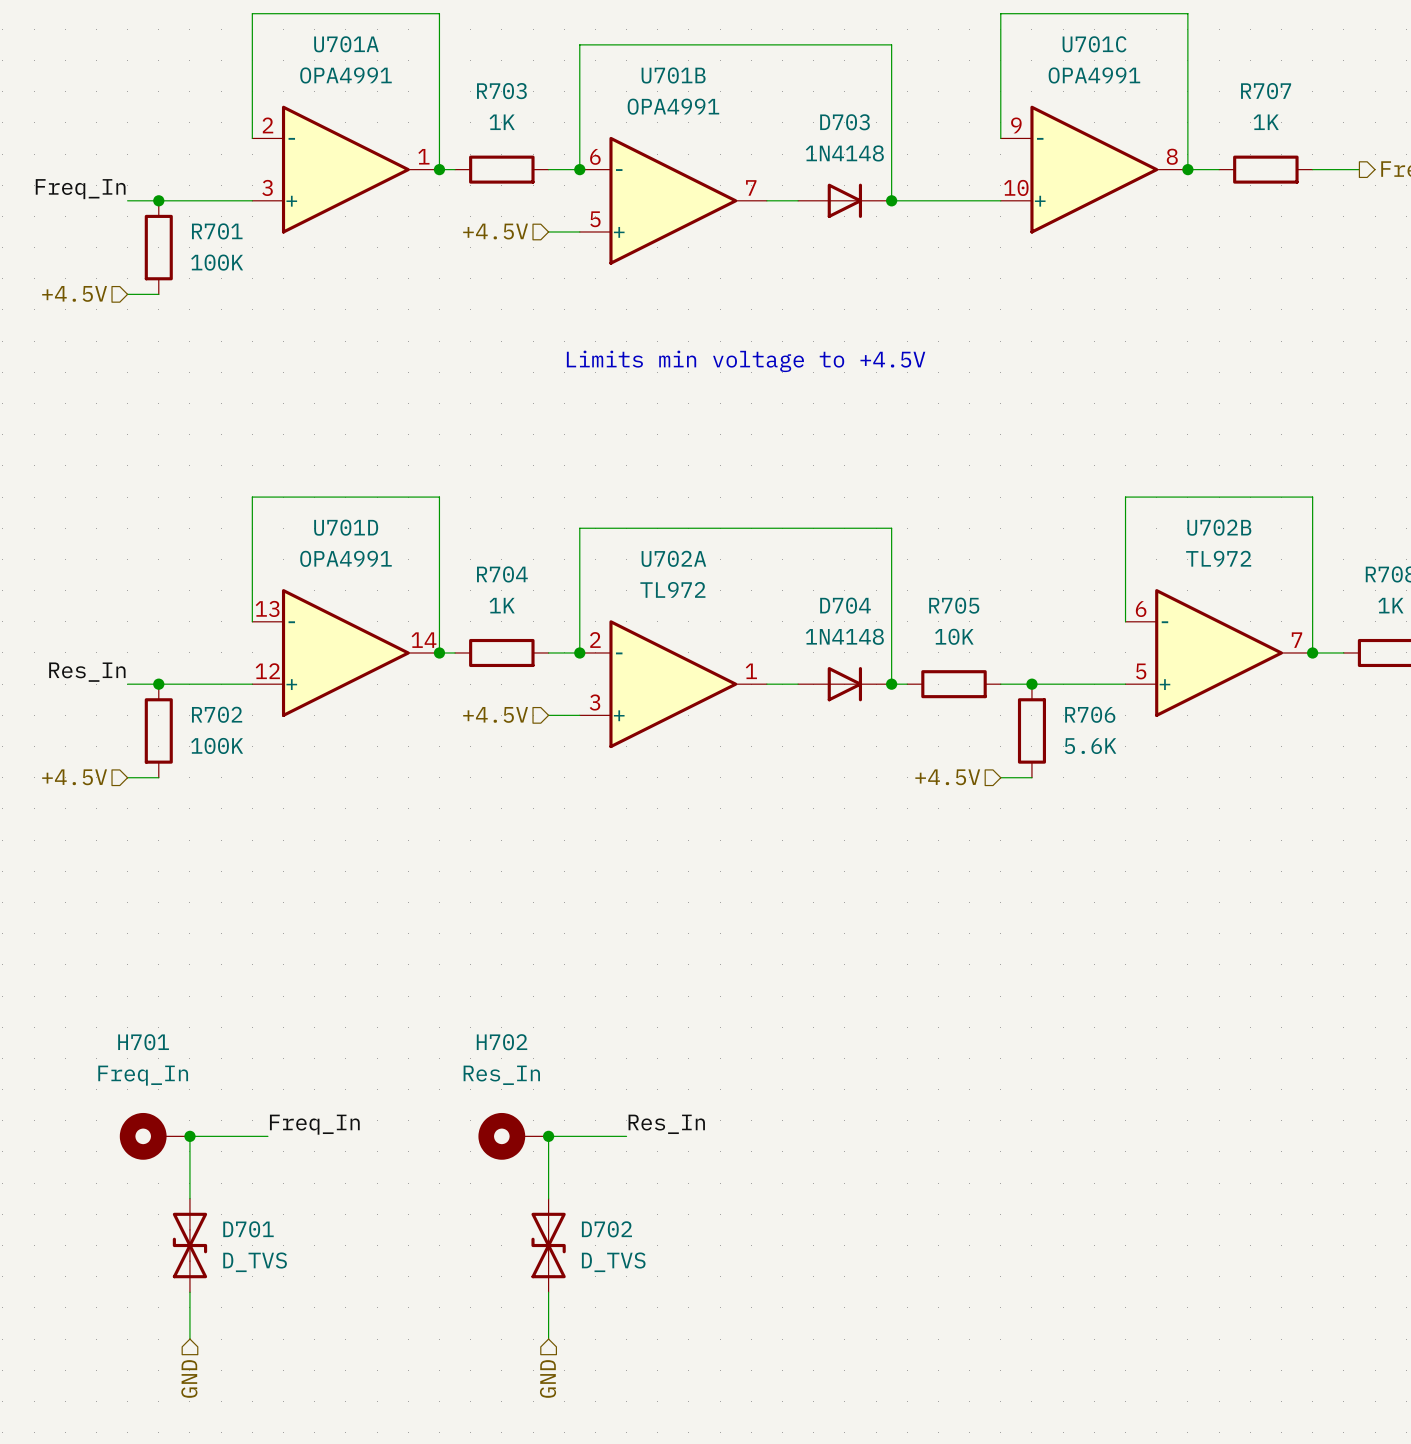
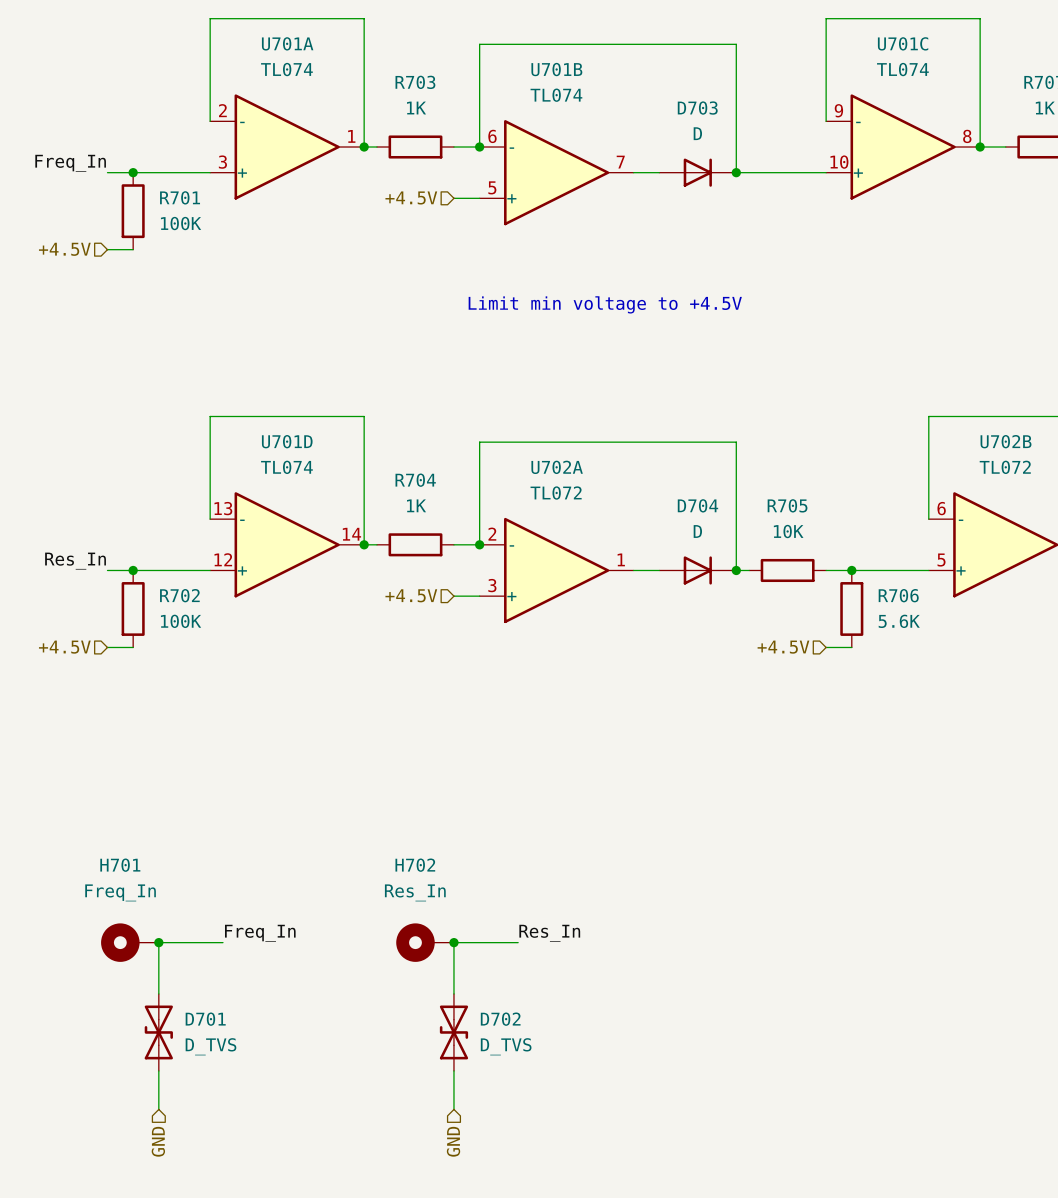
U701A value: OPA4991 (345, 75) -> TL074 (286, 69)
U701C value: OPA4991 (1094, 75) -> TL074 (902, 69)
U701B value: OPA4991 (673, 106) -> TL074 (556, 95)
D703 value: 1N4148 (844, 153) -> D (697, 133)
text: Limits min voltage to +4.5V (746, 361) -> Limit min voltage to +4.5V (605, 304)
U701D value: OPA4991 (345, 558) -> TL074 (286, 467)
U702B value: TL972 (1218, 558) -> TL072 (1005, 467)
U702A value: TL972 (672, 589) -> TL072 (556, 493)
D704 value: 1N4148 (844, 636) -> D (697, 531)

